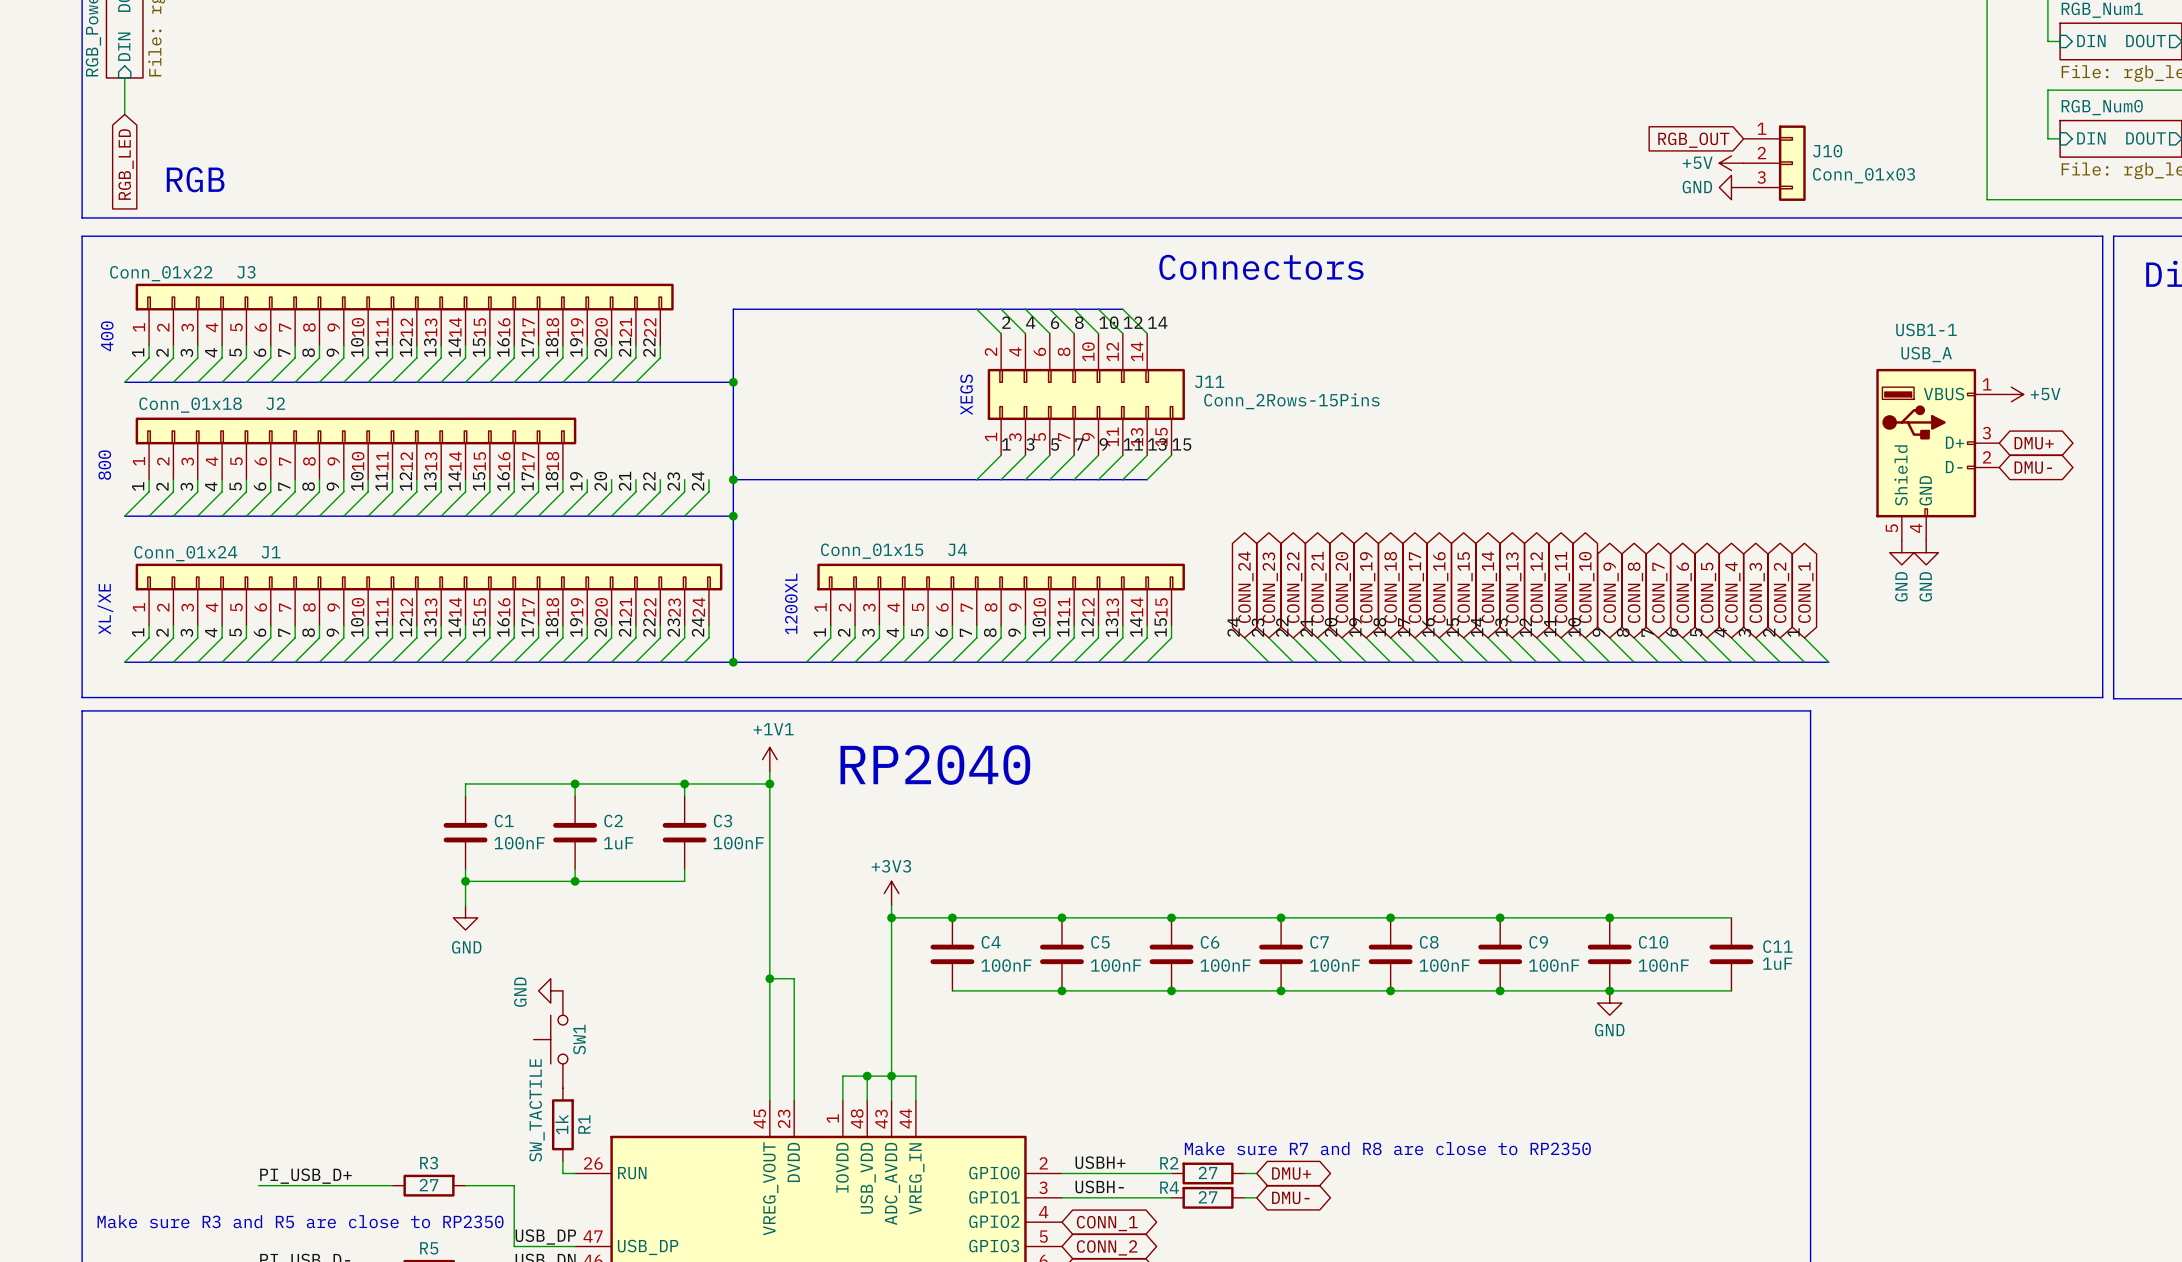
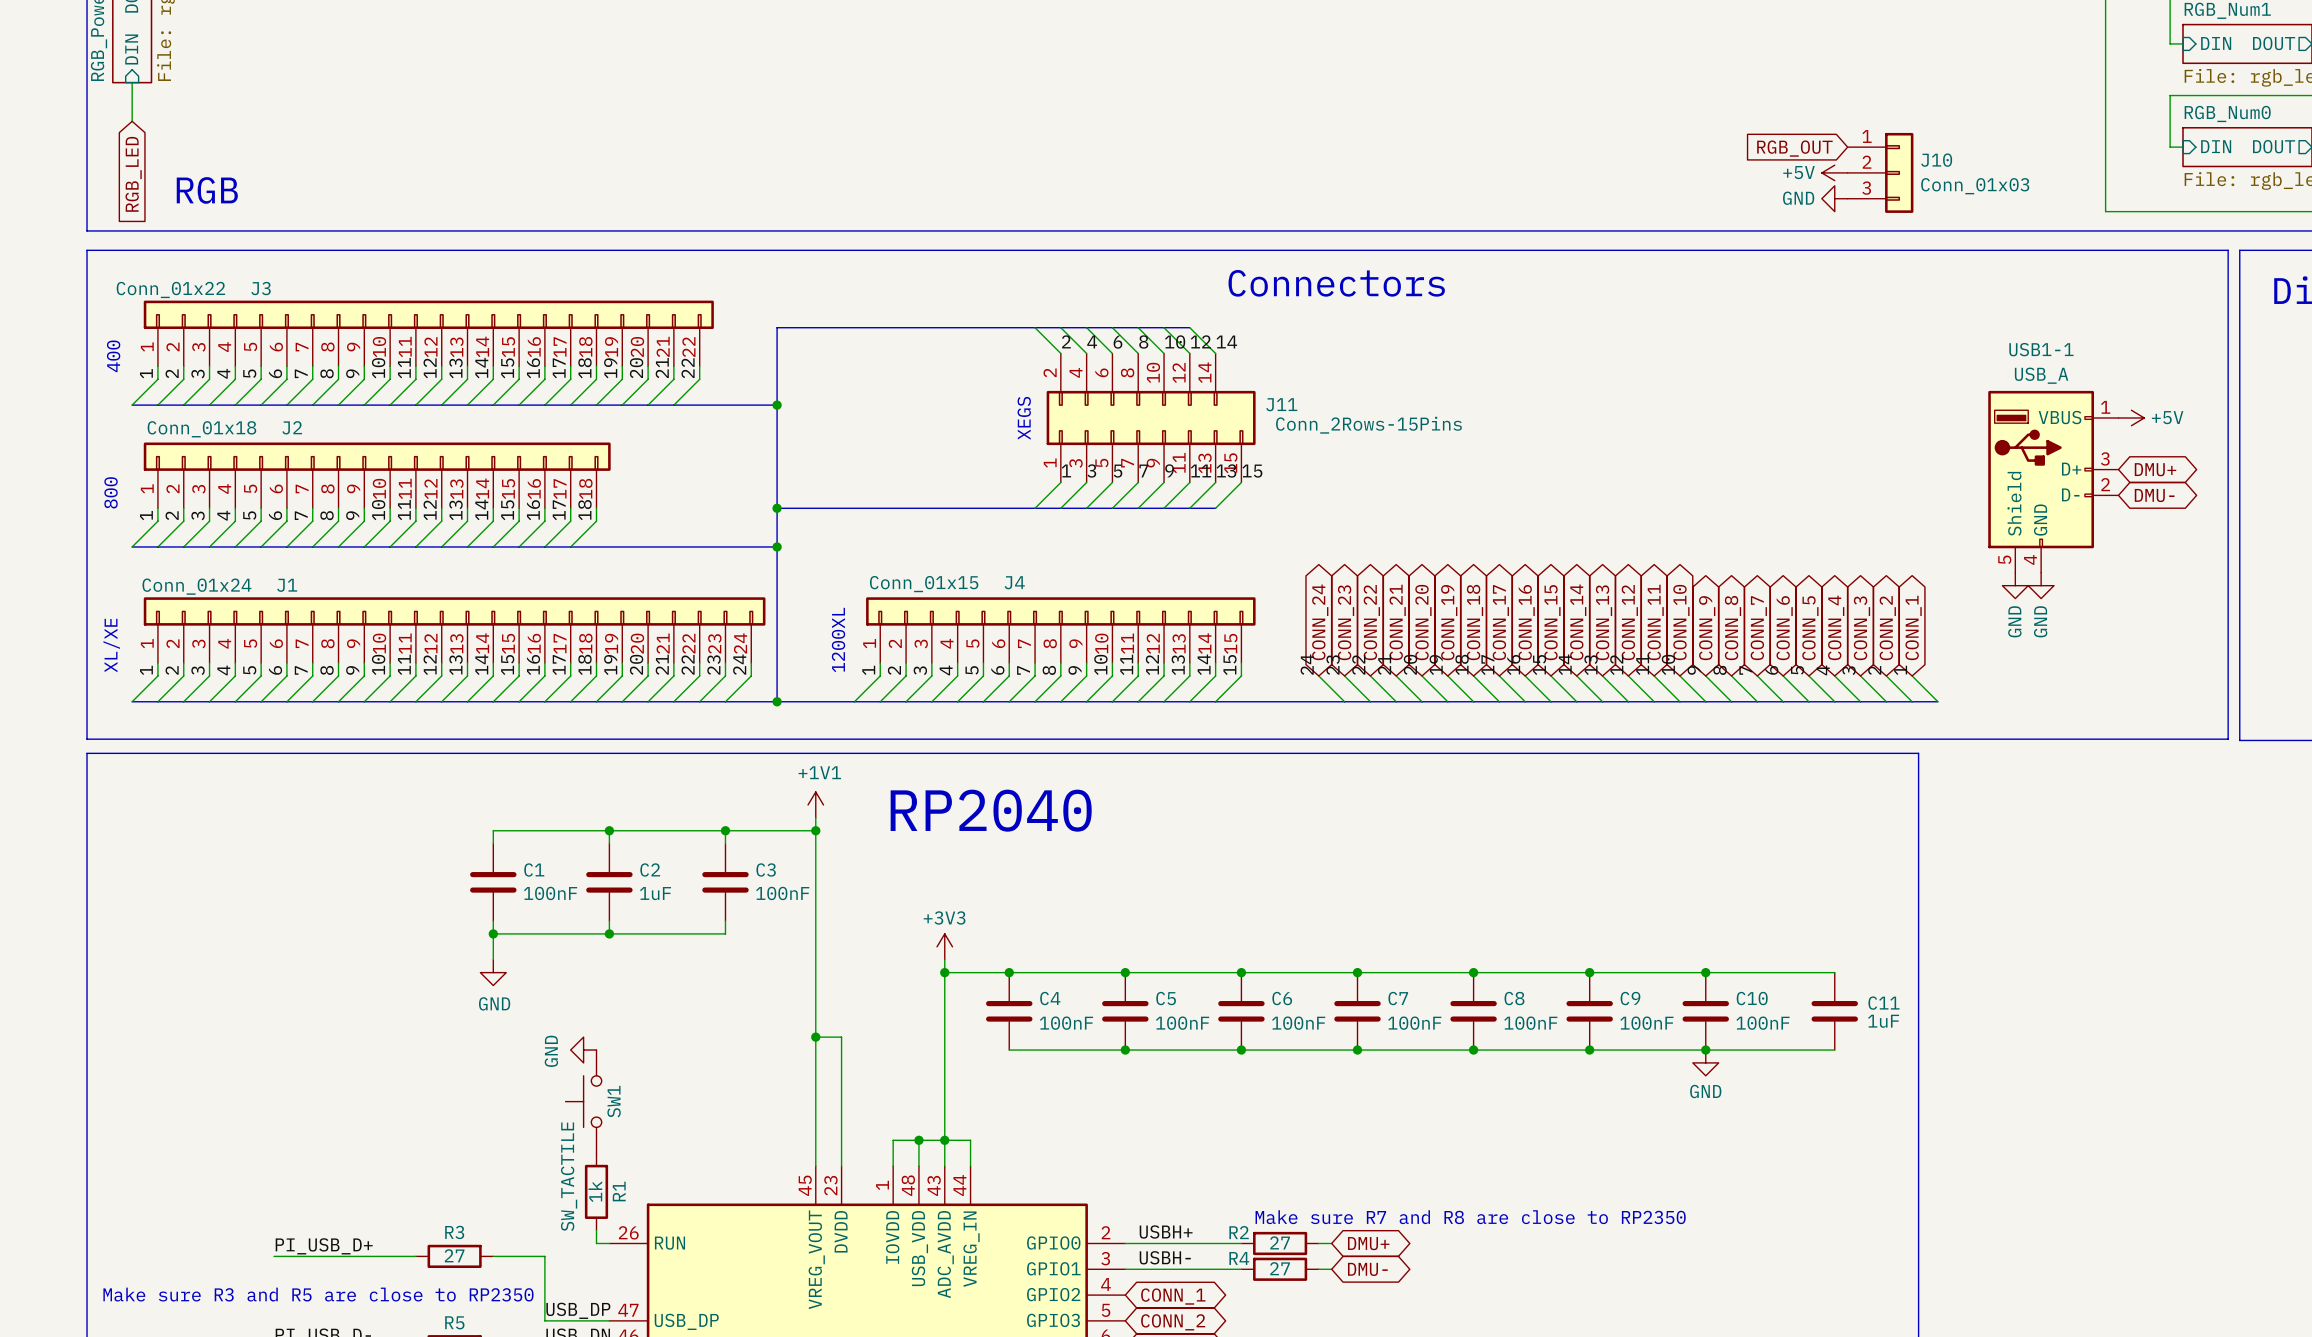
wire: (587, 479) (587, 491) (562, 516) -> none
wire: (611, 479) (611, 491) (587, 516) -> none
wire: (635, 479) (635, 491) (611, 516) -> none
wire: (660, 479) (660, 491) (635, 516) -> none
wire: (684, 479) (684, 491) (660, 516) -> none
wire: (708, 479) (708, 491) (684, 516) -> none
label: 19 (576, 481) -> none
label: 20 (600, 481) -> none
label: 21 (624, 481) -> none
label: 22 (649, 481) -> none
label: 23 (673, 481) -> none
label: 24 (698, 481) -> none

